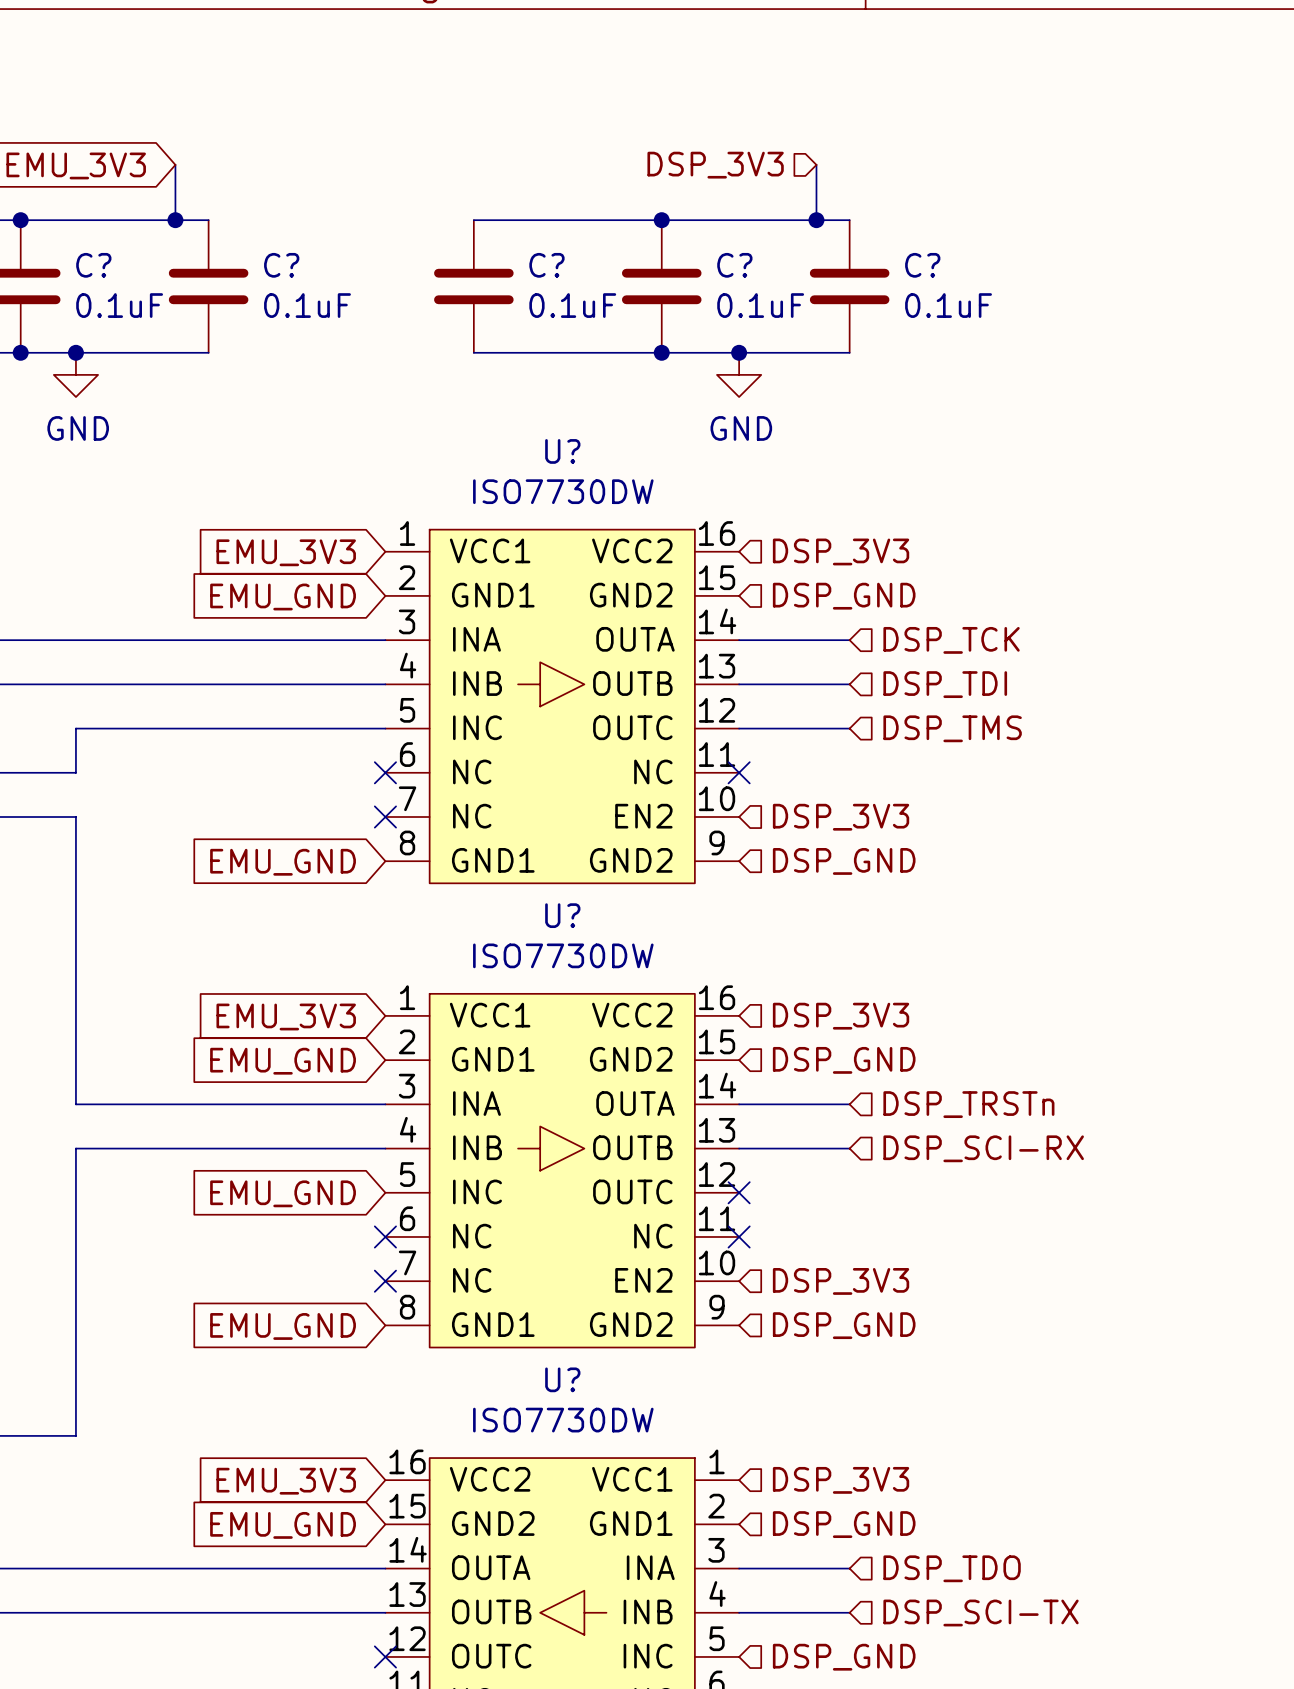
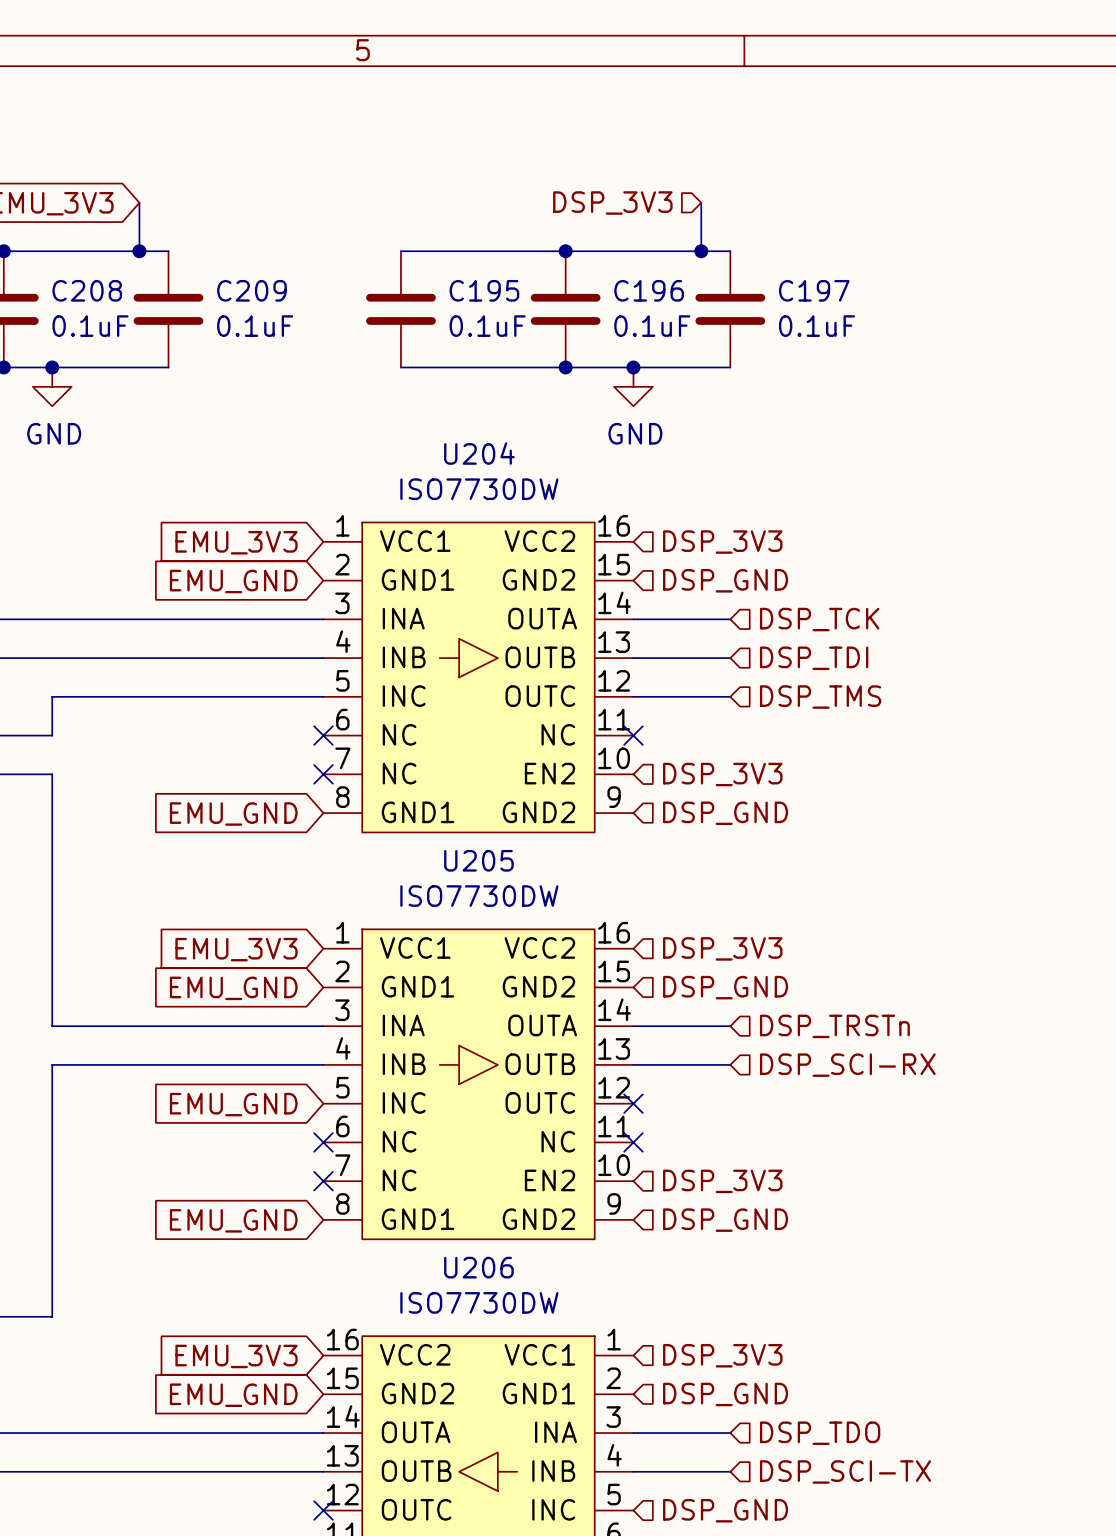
C? name: C? (93, 265) -> C208 (87, 290)
C? name: C? (281, 265) -> C209 (251, 290)
C? name: C? (546, 265) -> C195 (484, 290)
C? name: C? (734, 265) -> C196 (649, 290)
C? name: C? (922, 265) -> C197 (814, 290)
U? name: U? (562, 451) -> U204 (479, 453)
U? name: U? (562, 915) -> U205 (478, 860)
U? name: U? (562, 1379) -> U206 (478, 1267)

